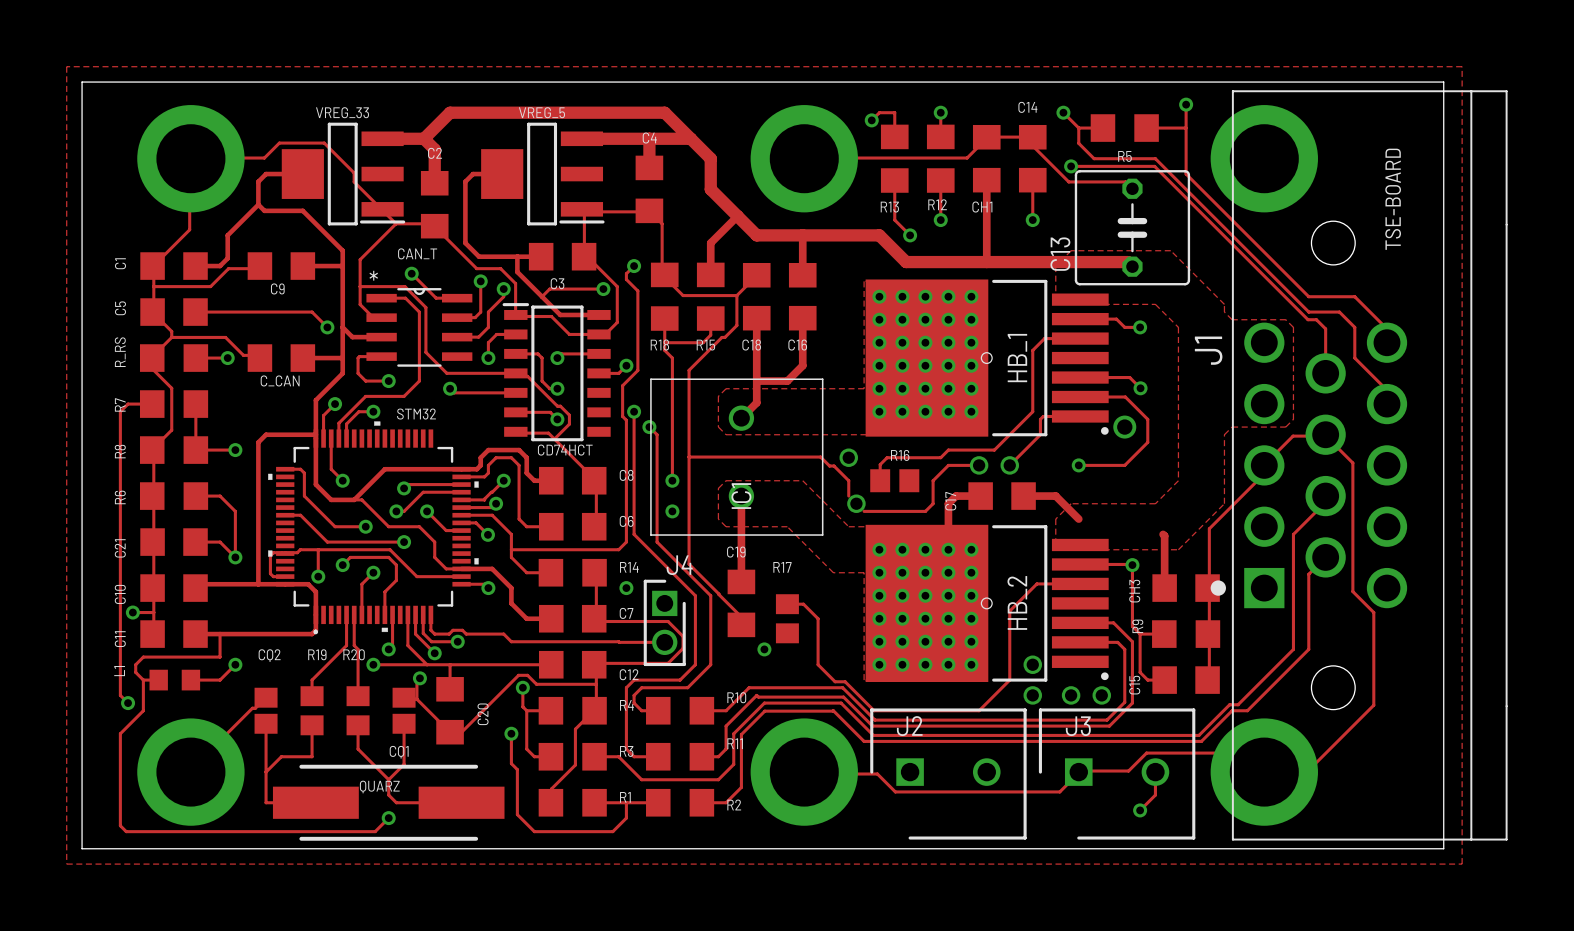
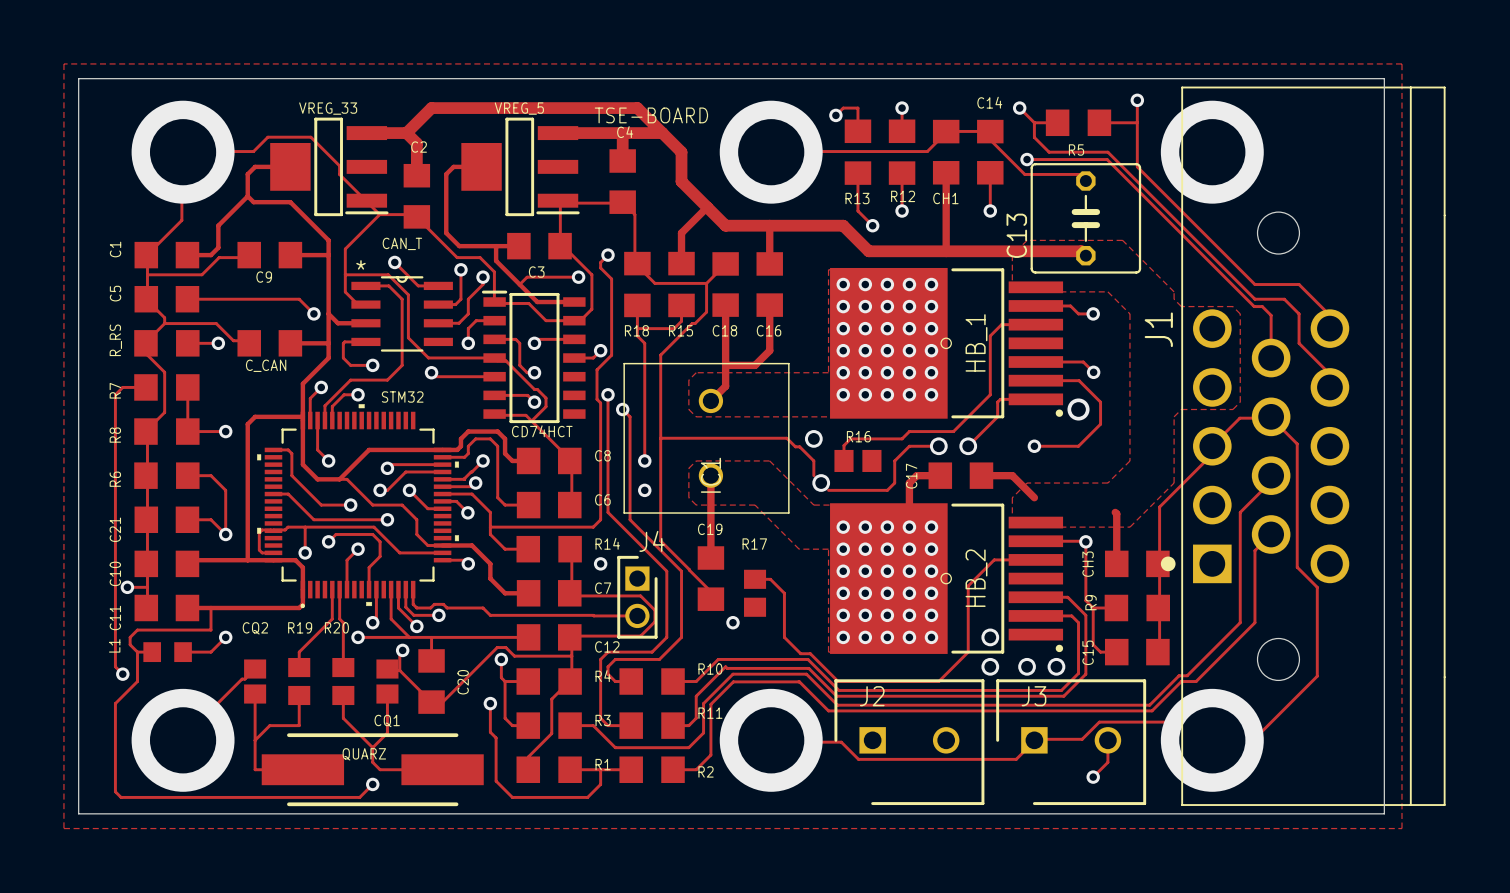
text: none -> TSE-BOARD (651, 115)
text: TSE-BOARD (1393, 199) -> none

